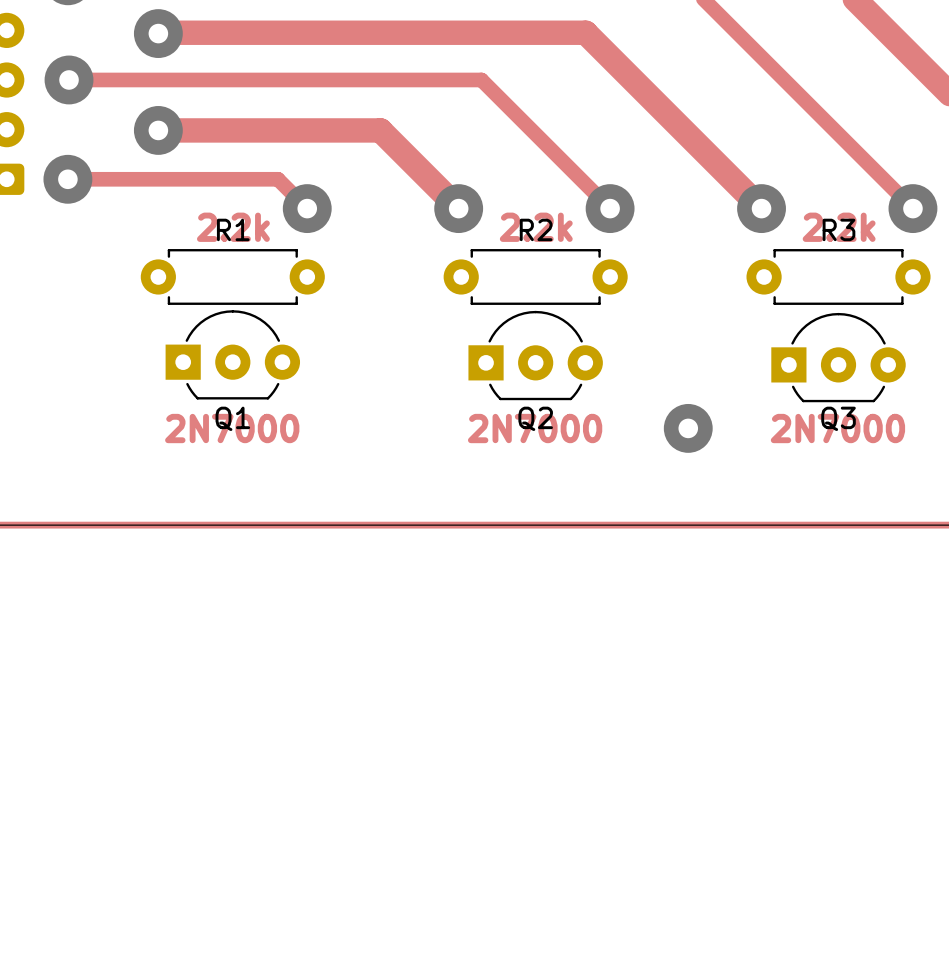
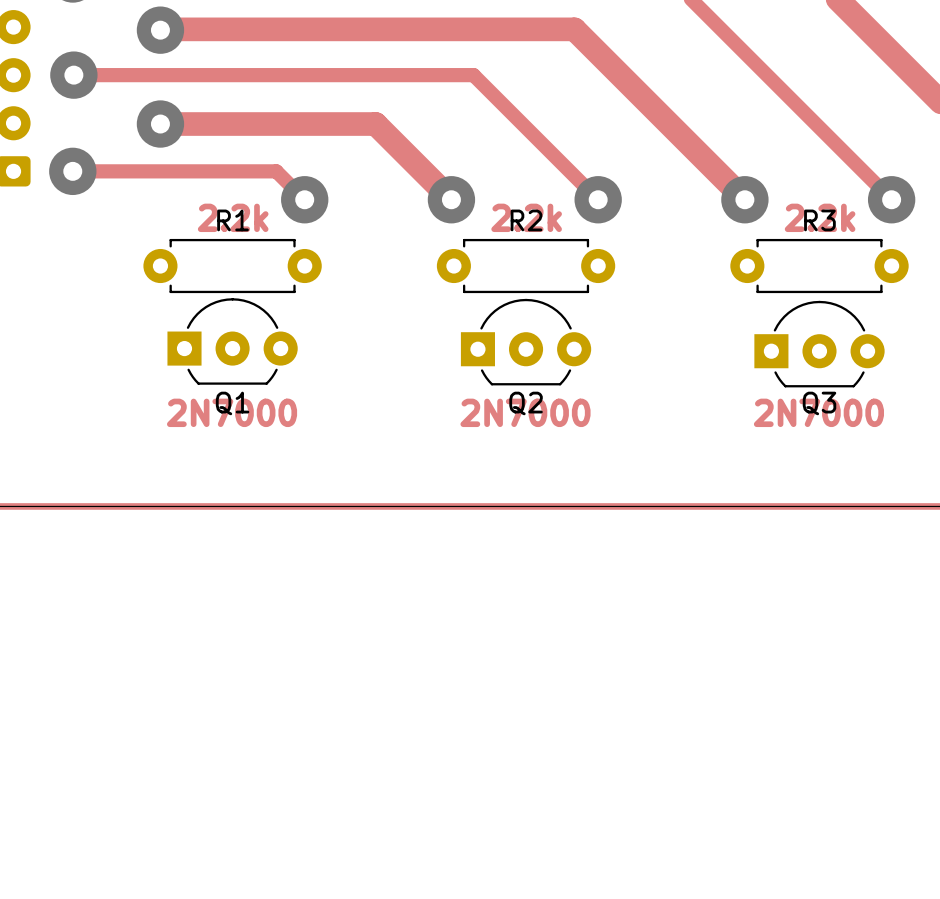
via: (688, 428) -> none

